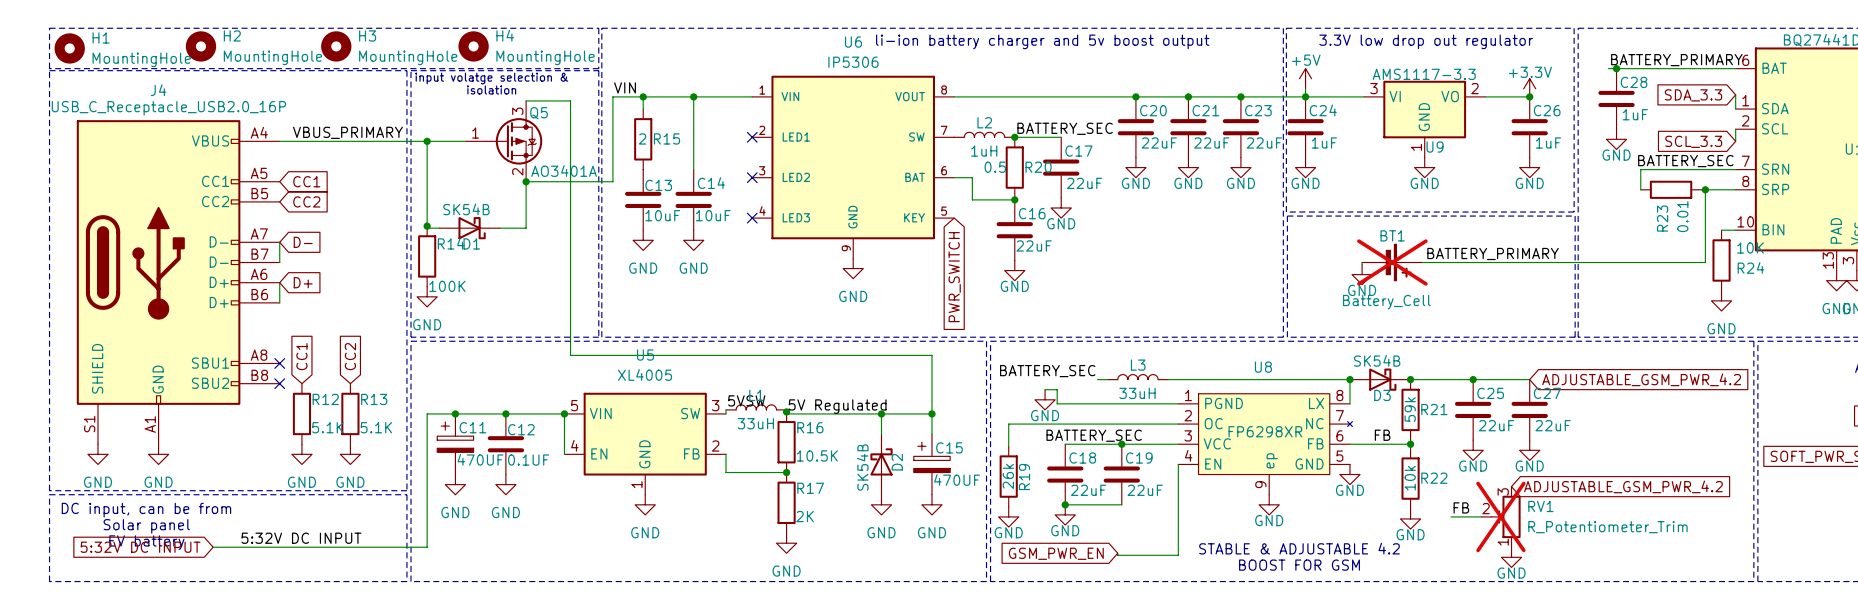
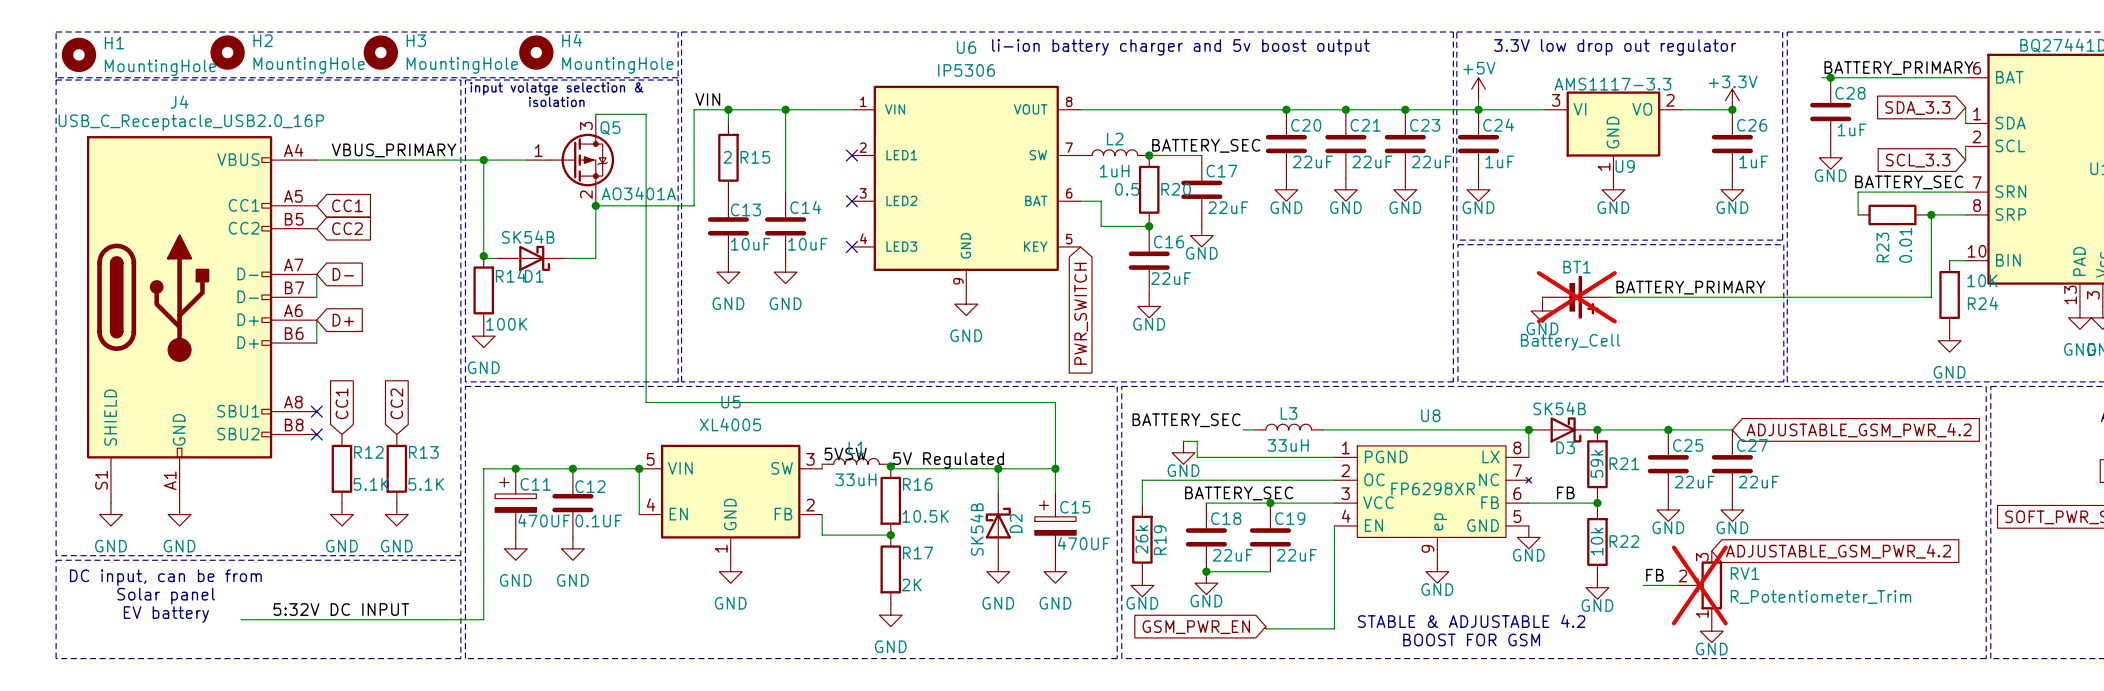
global label: 5:32V DC INPUT (140, 547) -> none

